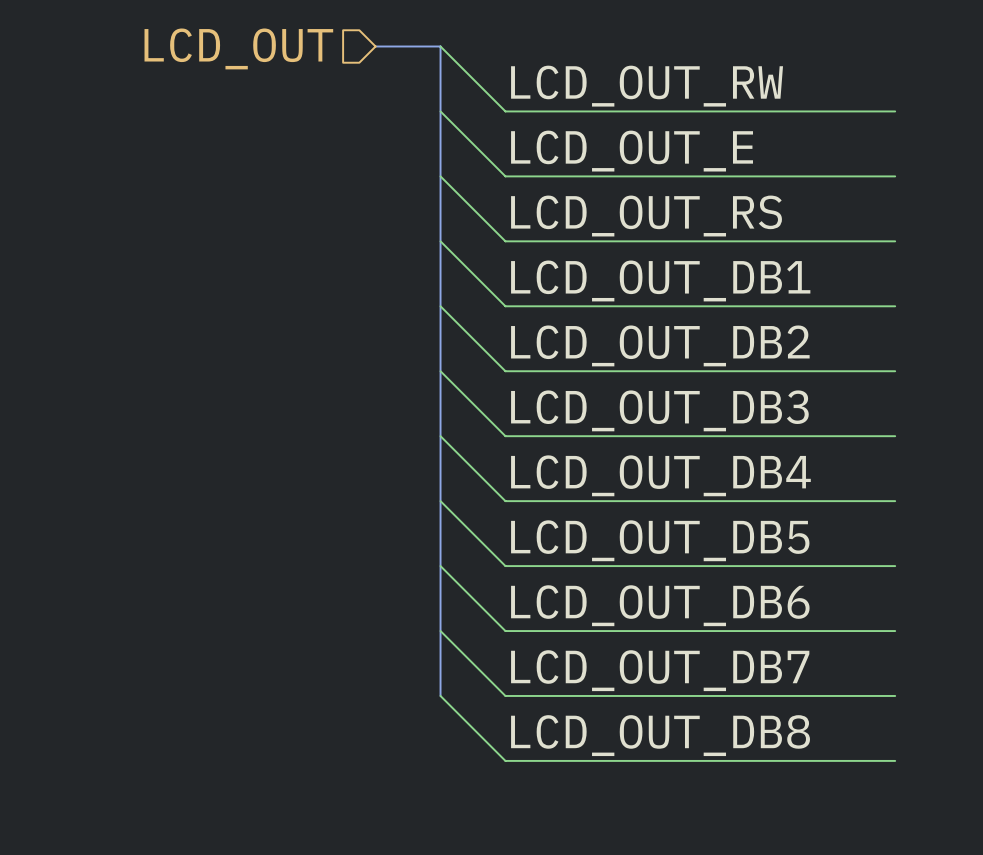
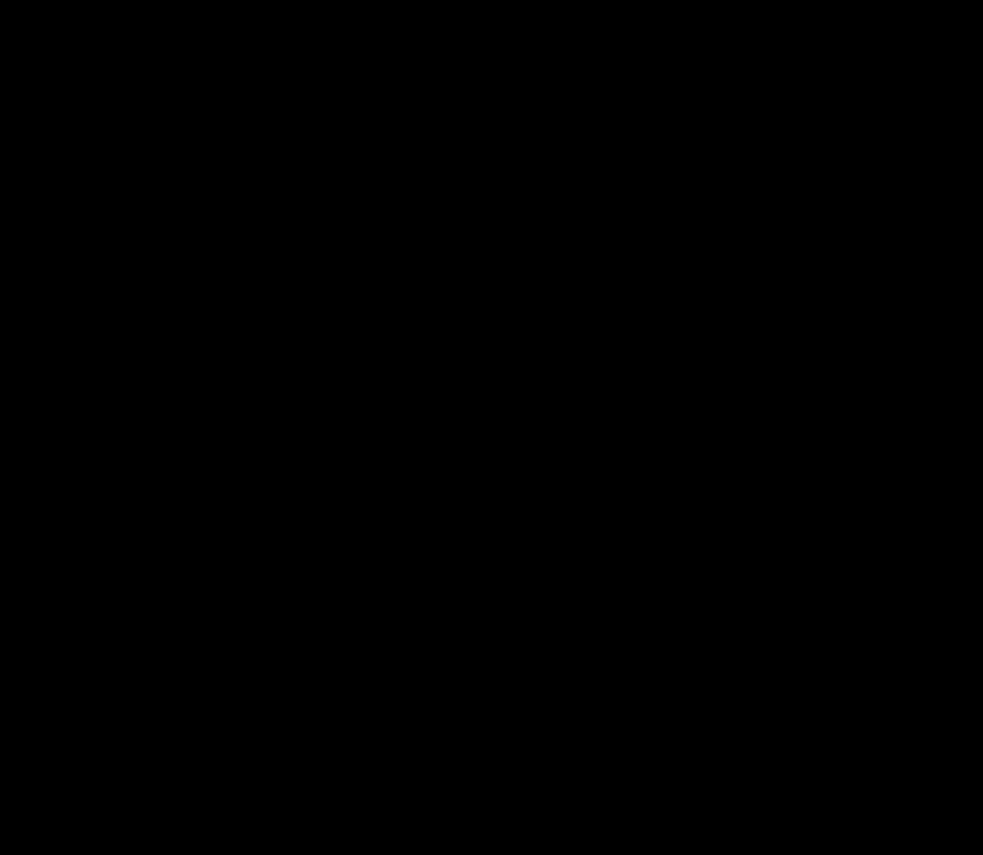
bus: (375, 46) (440, 46) (440, 695) -> none
wire: (440, 46) (505, 111) (895, 111) -> none
hierarchical label: LCD_OUT (238, 48) -> none
label: LCD_OUT_RW (647, 86) -> none
wire: (440, 111) (505, 176) (895, 176) -> none
label: LCD_OUT_E (632, 151) -> none
wire: (440, 176) (505, 241) (895, 241) -> none
label: LCD_OUT_RS (646, 216) -> none
wire: (440, 241) (505, 306) (895, 306) -> none
label: LCD_OUT_DB1 (660, 280) -> none
wire: (440, 306) (505, 371) (895, 371) -> none
label: LCD_OUT_DB2 (660, 345) -> none
wire: (440, 371) (505, 436) (895, 436) -> none
label: LCD_OUT_DB3 (659, 410) -> none
wire: (440, 436) (505, 501) (895, 501) -> none
label: LCD_OUT_DB4 (660, 475) -> none
wire: (440, 501) (505, 566) (895, 566) -> none
label: LCD_OUT_DB5 (660, 540) -> none
wire: (440, 566) (505, 631) (895, 631) -> none
label: LCD_OUT_DB6 (660, 605) -> none
wire: (440, 631) (505, 695) (895, 695) -> none
label: LCD_OUT_DB7 (660, 670) -> none
wire: (440, 695) (505, 760) (895, 760) -> none
label: LCD_OUT_DB8 (660, 735) -> none

